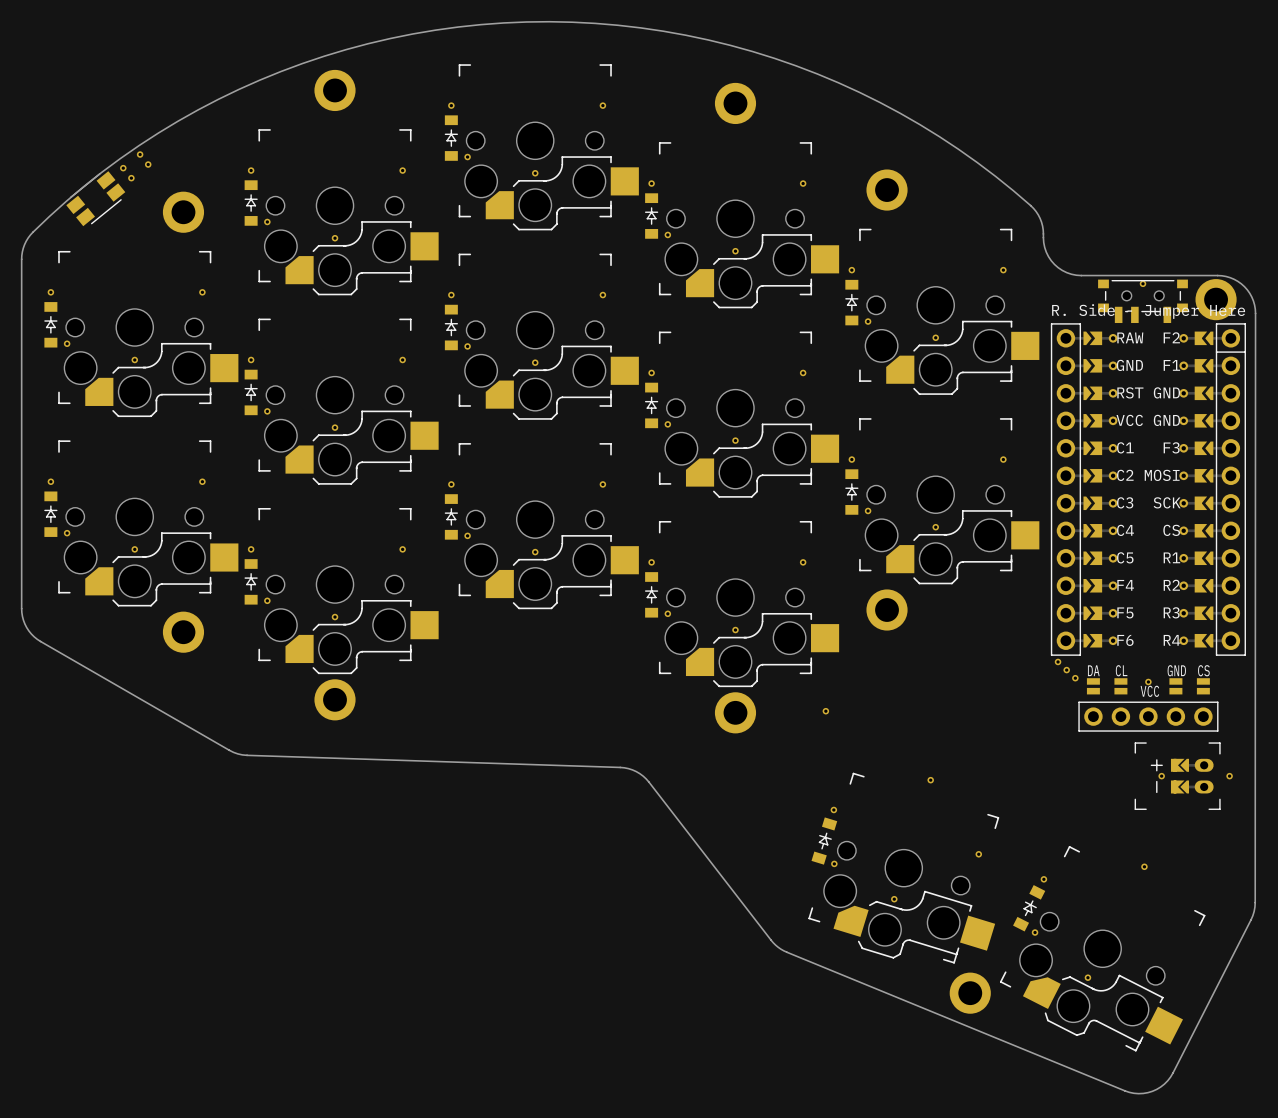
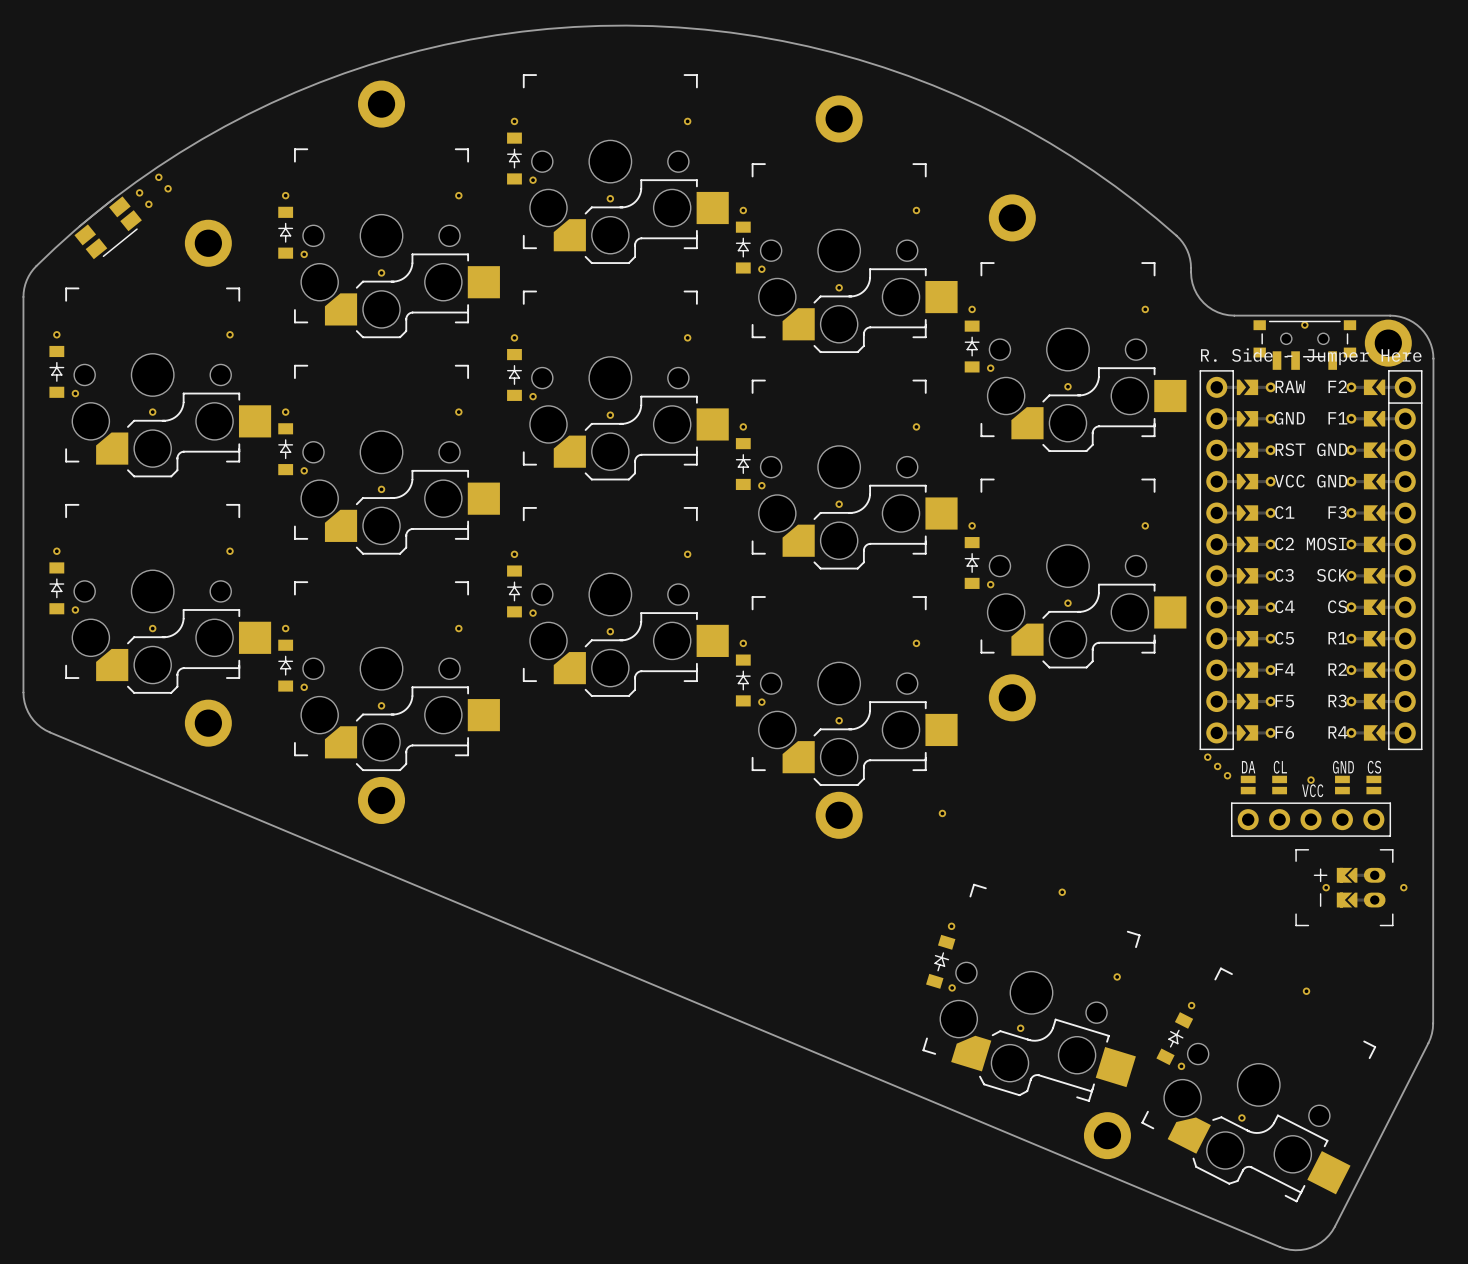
board edge: (21, 605) (24, 624) (37, 639) (237, 753) (620, 767) (632, 769) (648, 782) (771, 940) (780, 949) (1129, 1092) (1143, 1093) (1152, 1091) (1164, 1084) (1170, 1077) (1251, 919) (1254, 907) (1255, 895) -> (23, 692) (26, 707) (30, 716) (37, 724) (50, 732) (1284, 1248) (1295, 1250) (1311, 1247) (1320, 1242) (1332, 1231) (1428, 1043) (1433, 1023)

